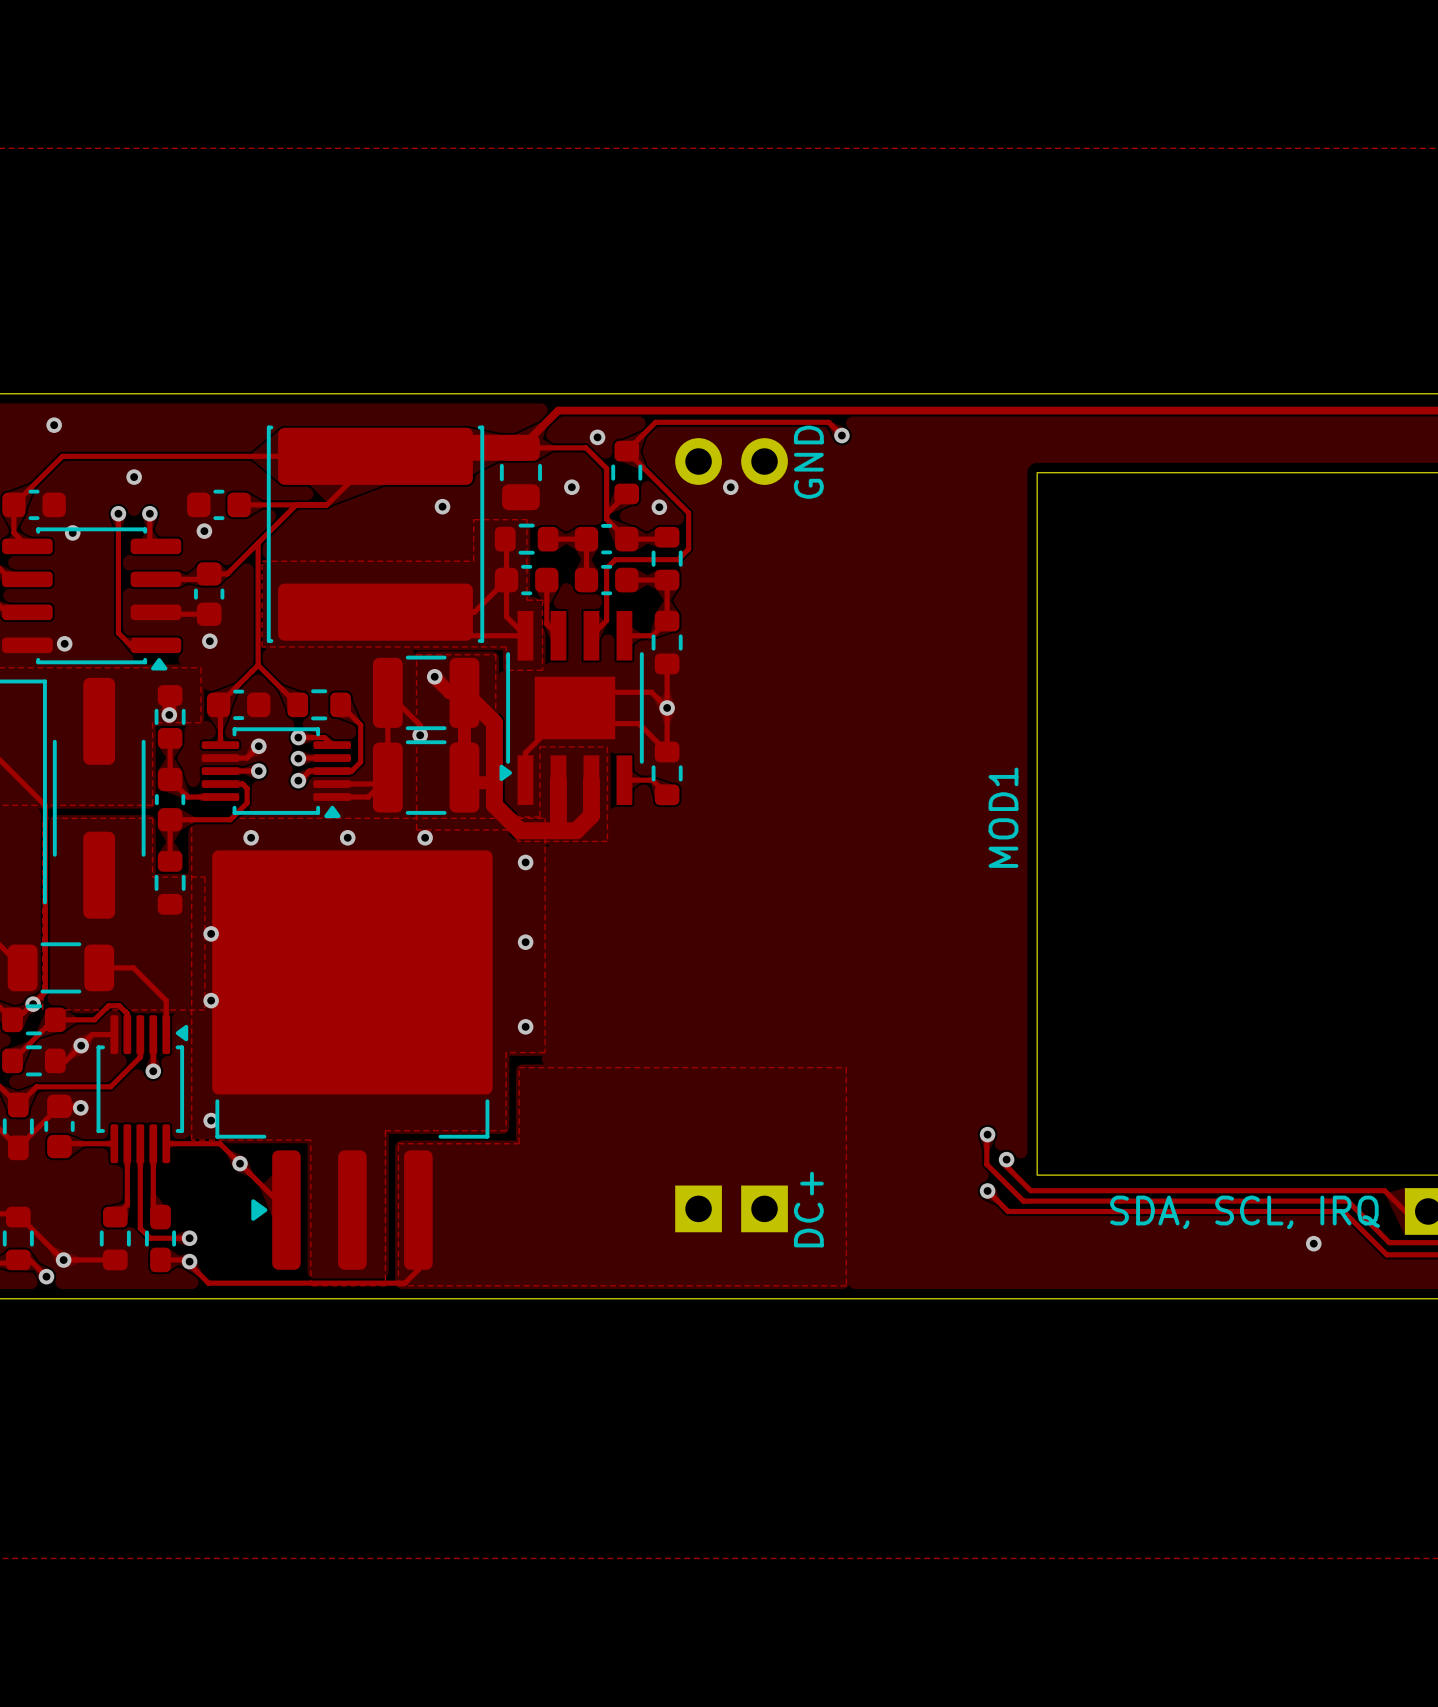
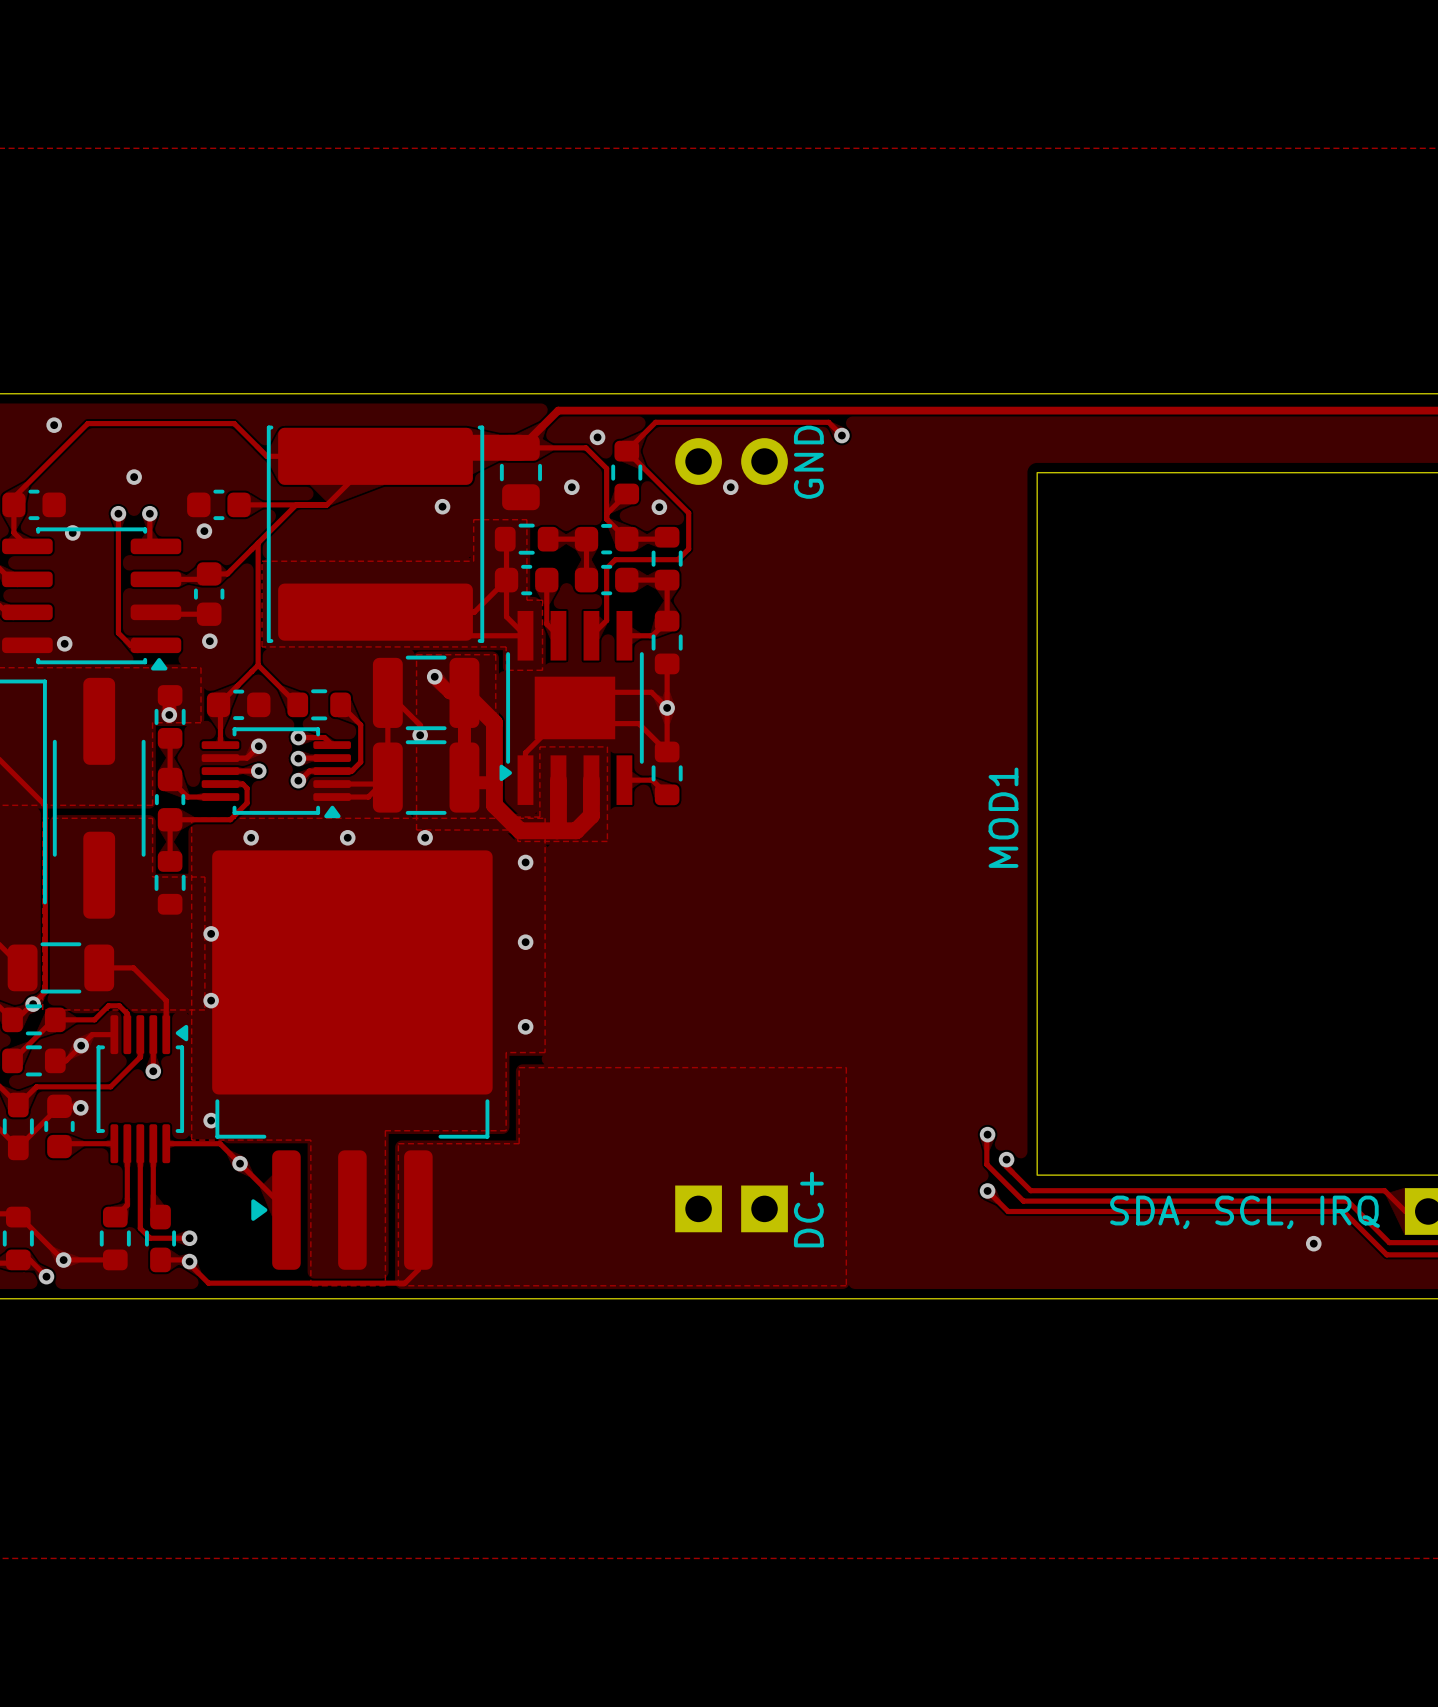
track: (266, 456) (62, 456) (13, 504) -> (266, 456) (234, 423) (87, 423) (13, 497)

